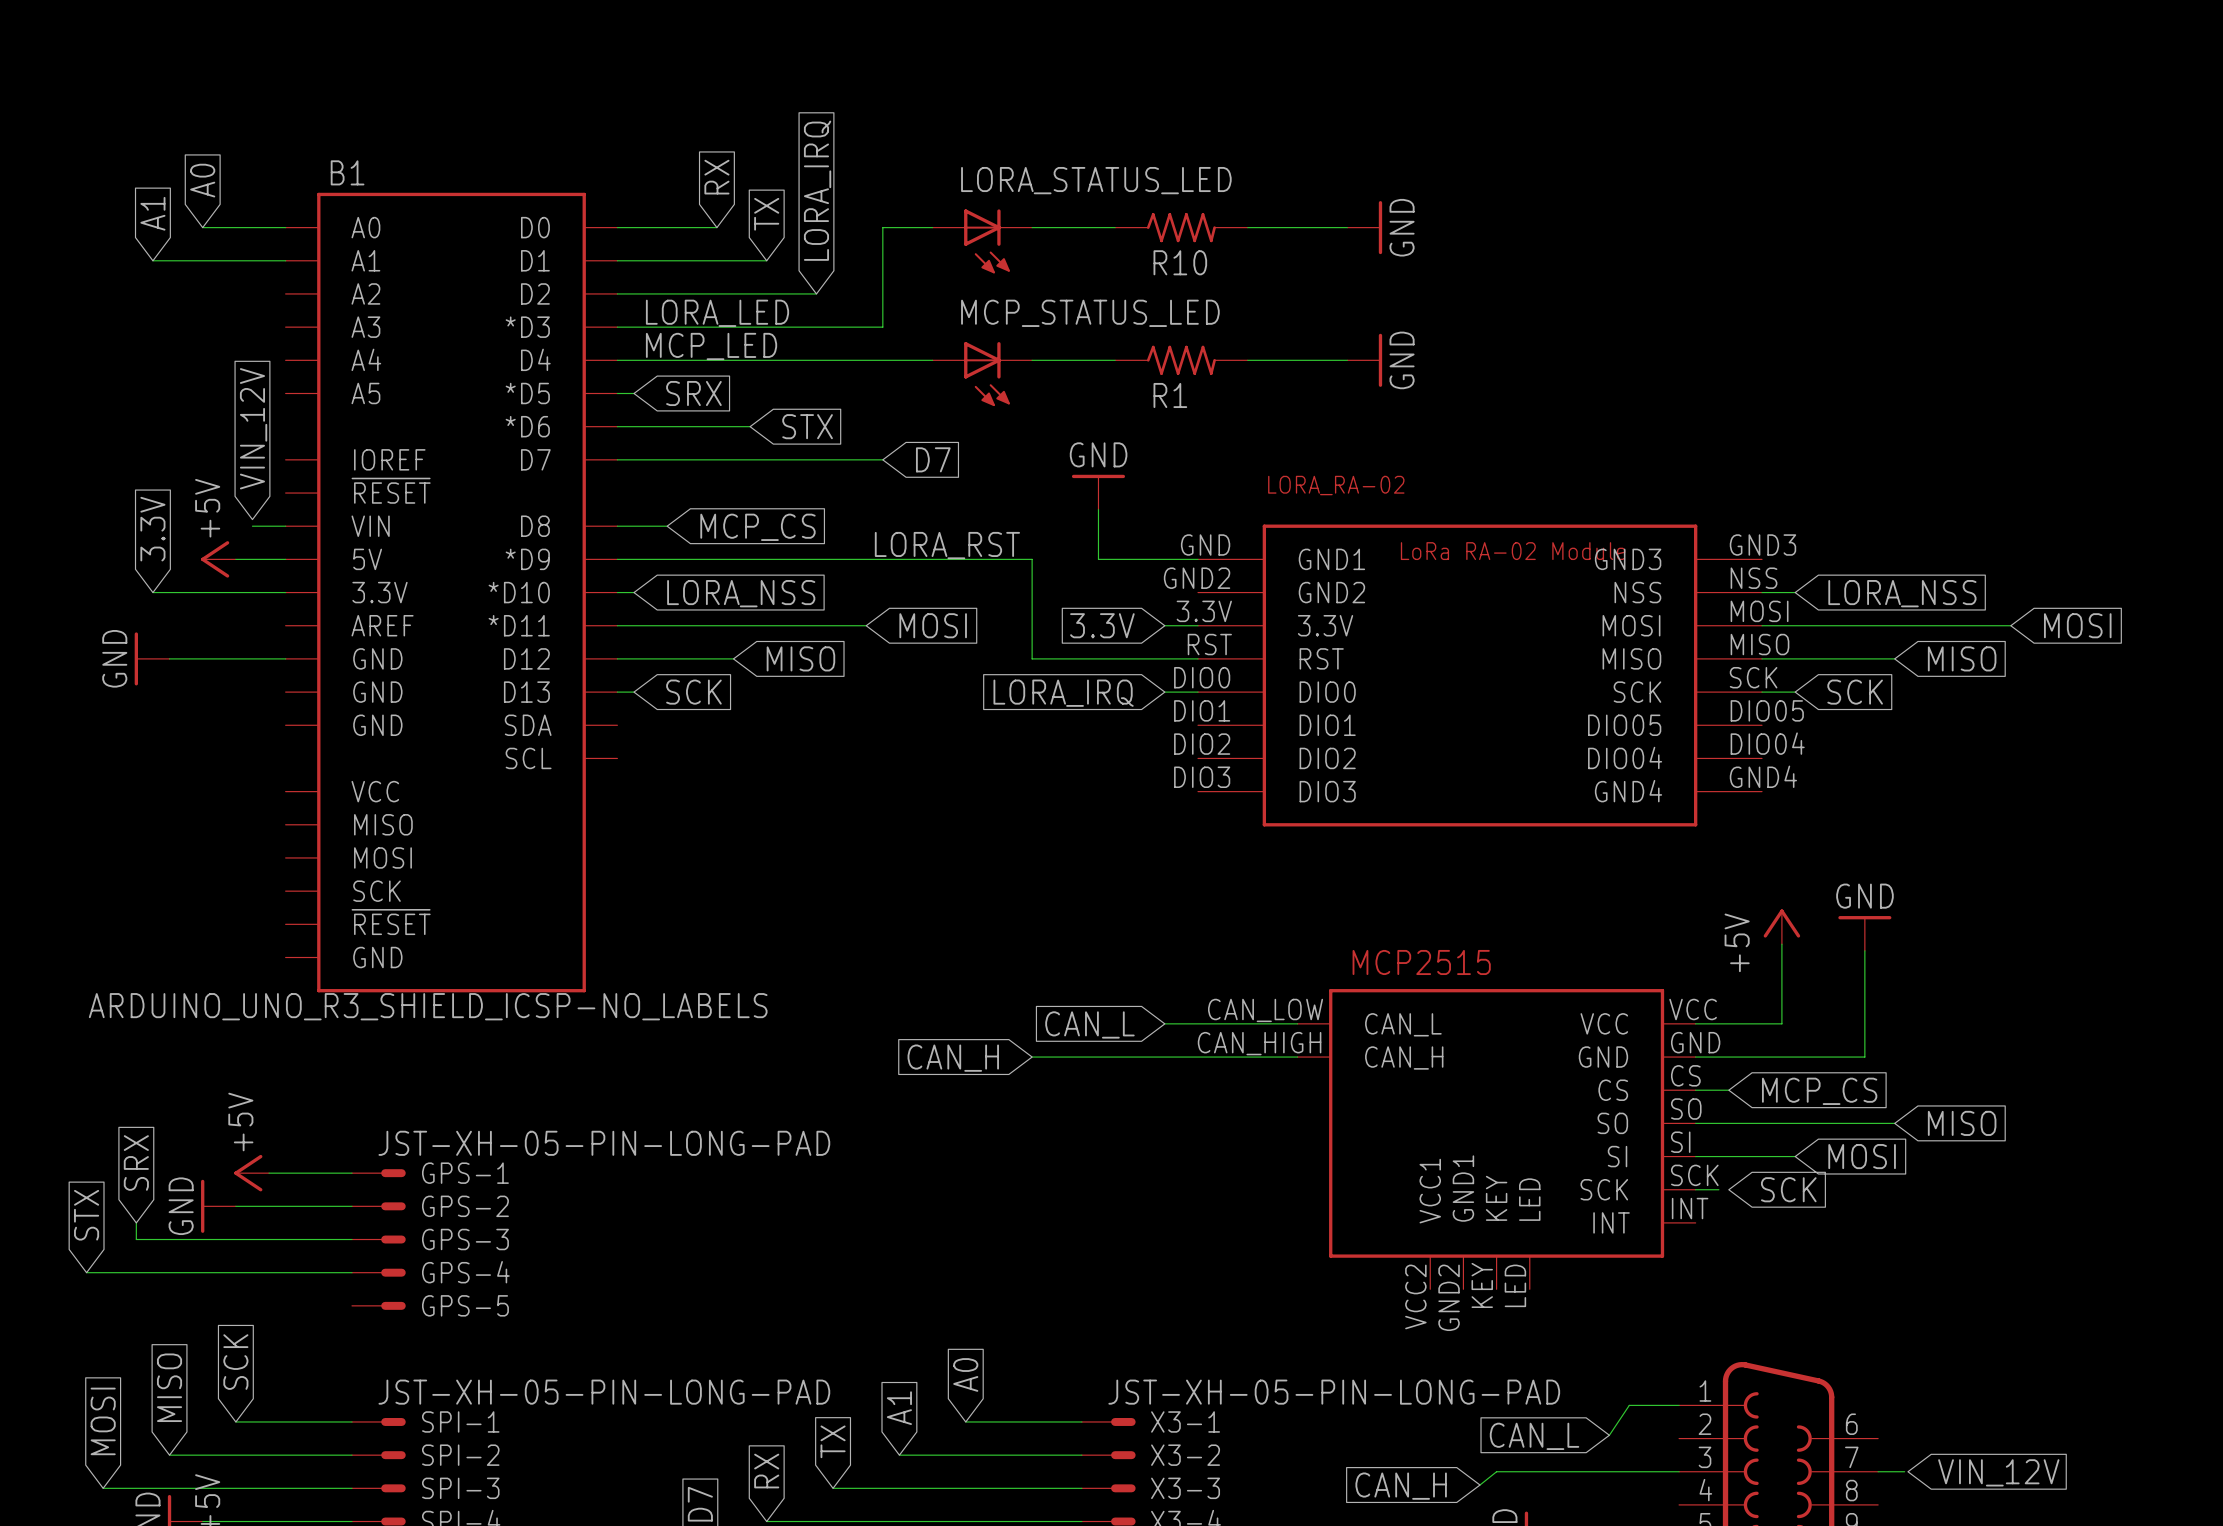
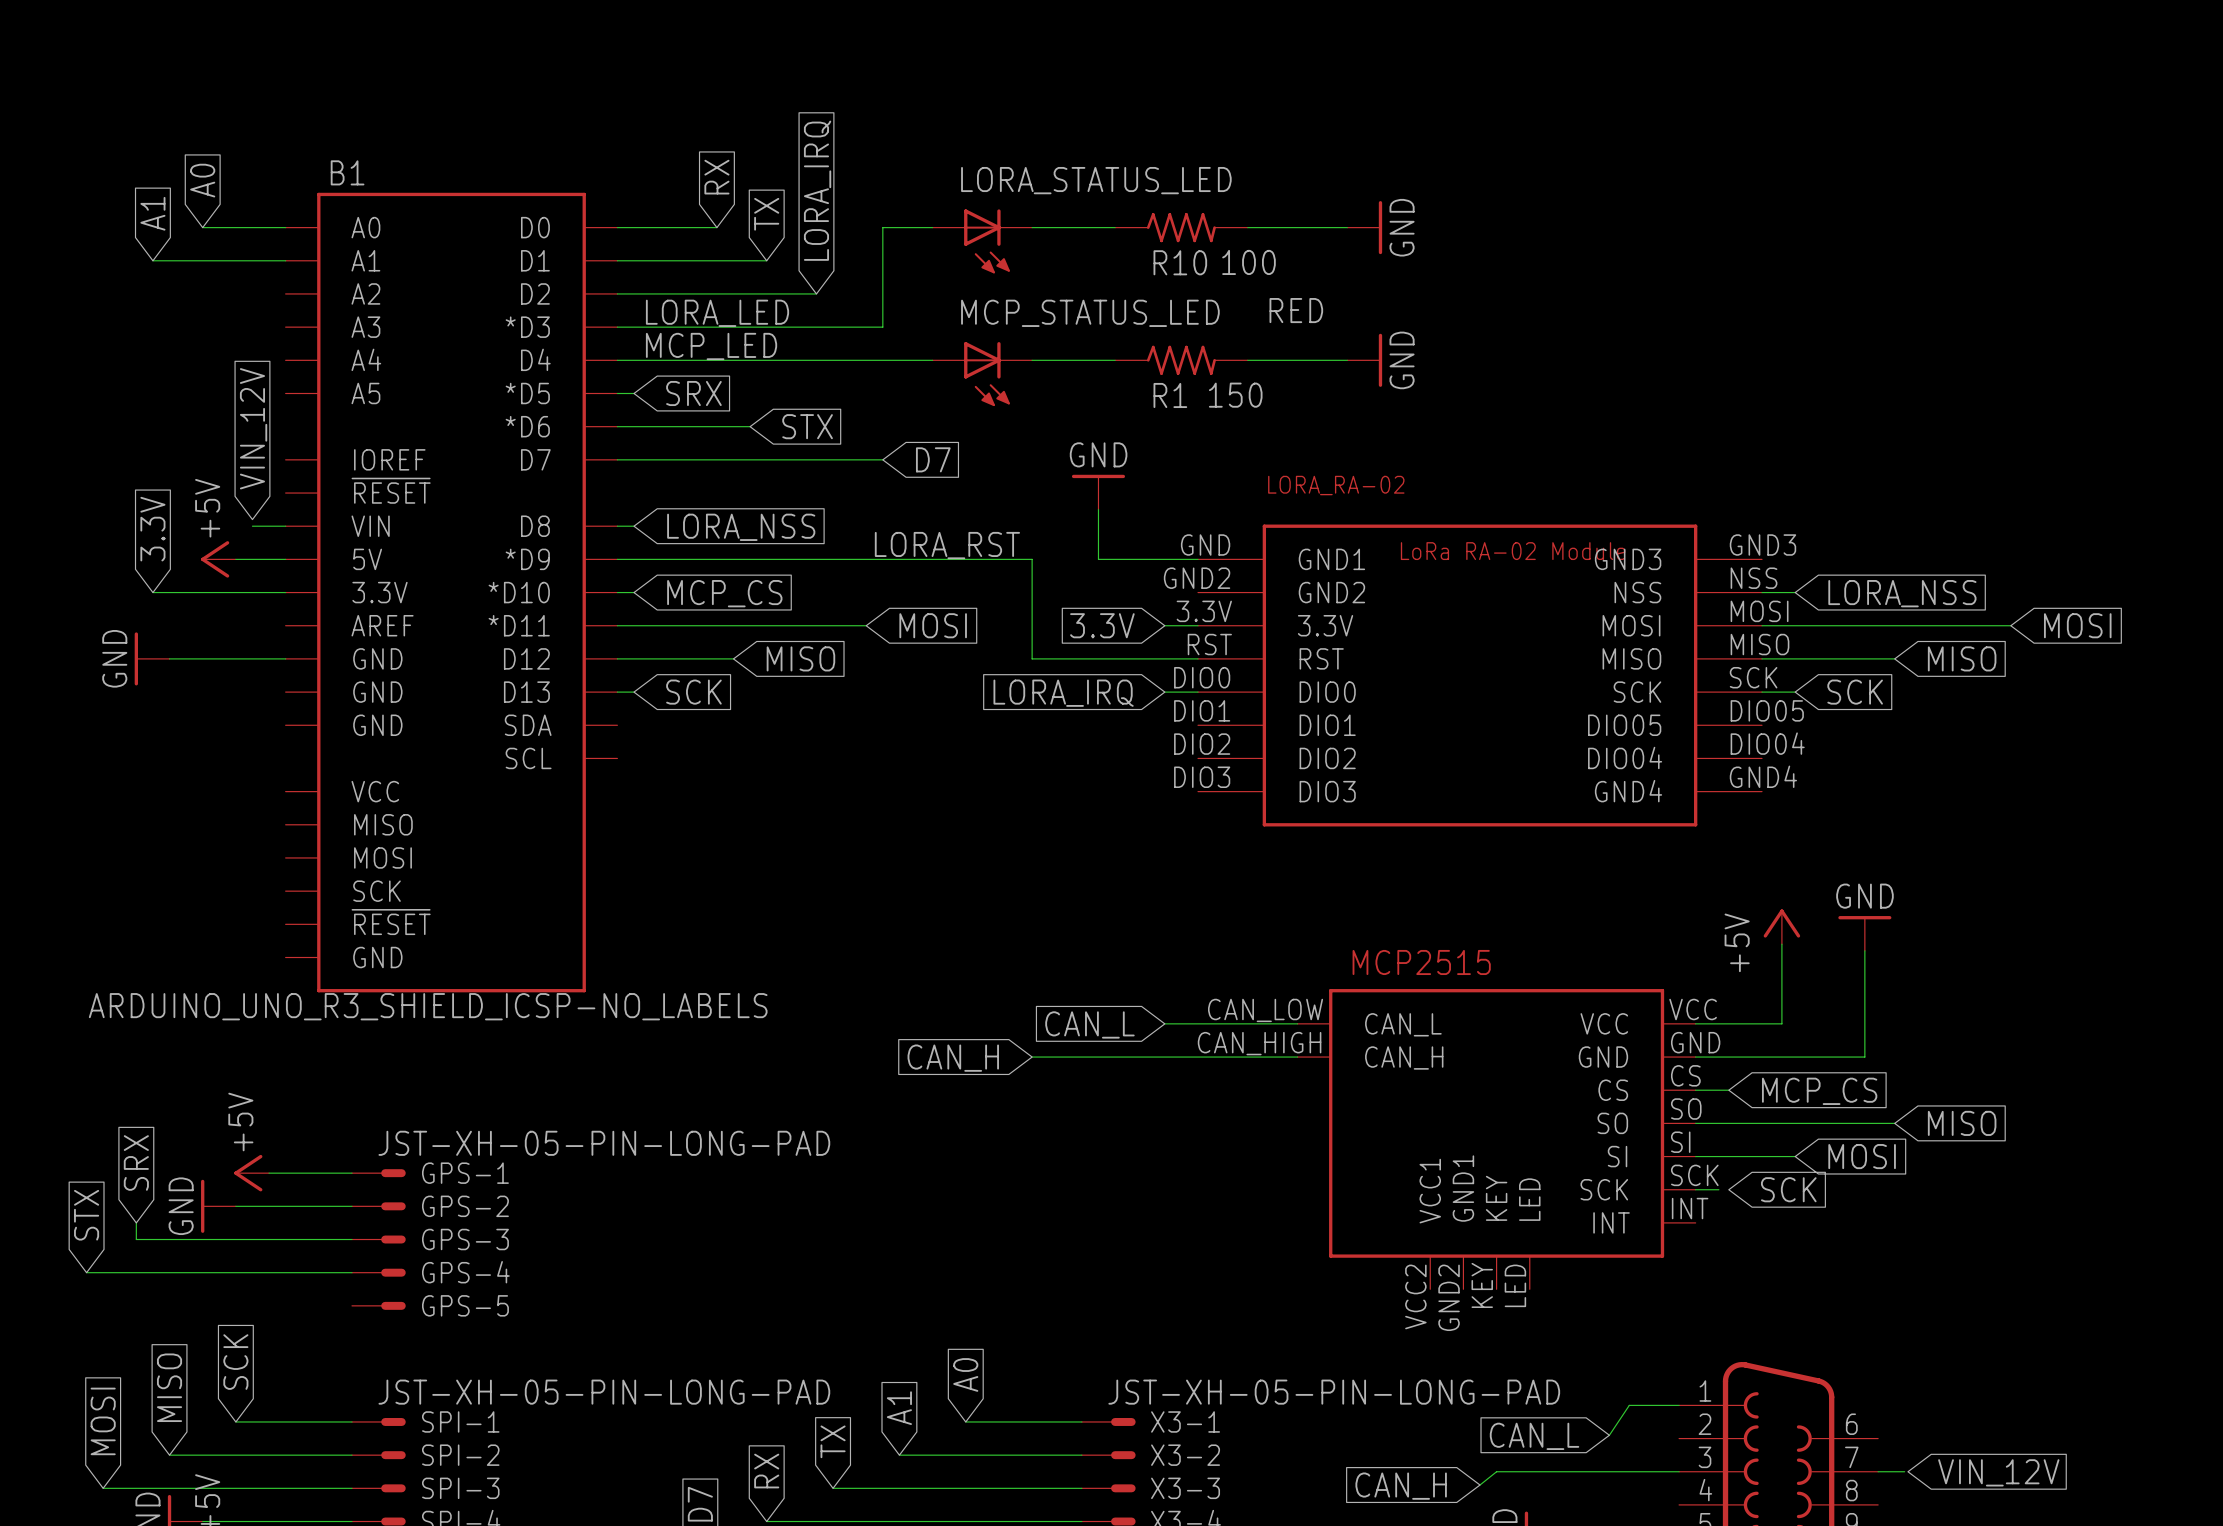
R10 value: none -> 100 (1248, 262)
MCP_STATUS_LED value: none -> RED (1296, 310)
R1 value: none -> 150 (1235, 395)
wire: (633, 526) (667, 526) -> none
global label: none -> LORA_NSS (741, 527)
global label: MCP_CS (757, 527) -> none
global label: LORA_NSS (741, 593) -> MCP_CS (724, 593)

